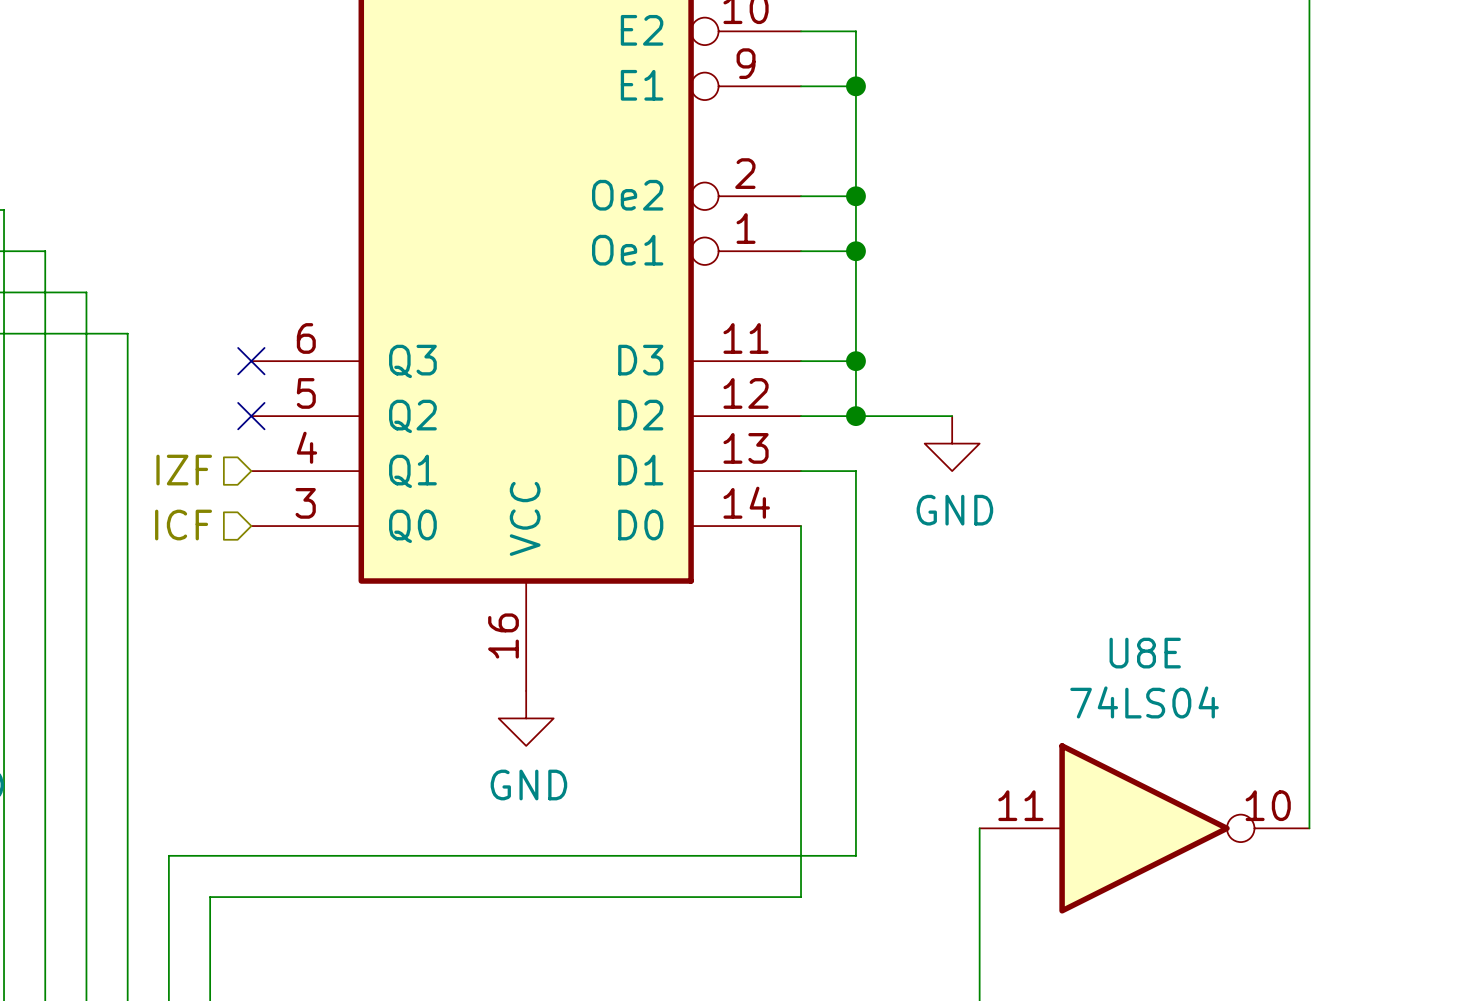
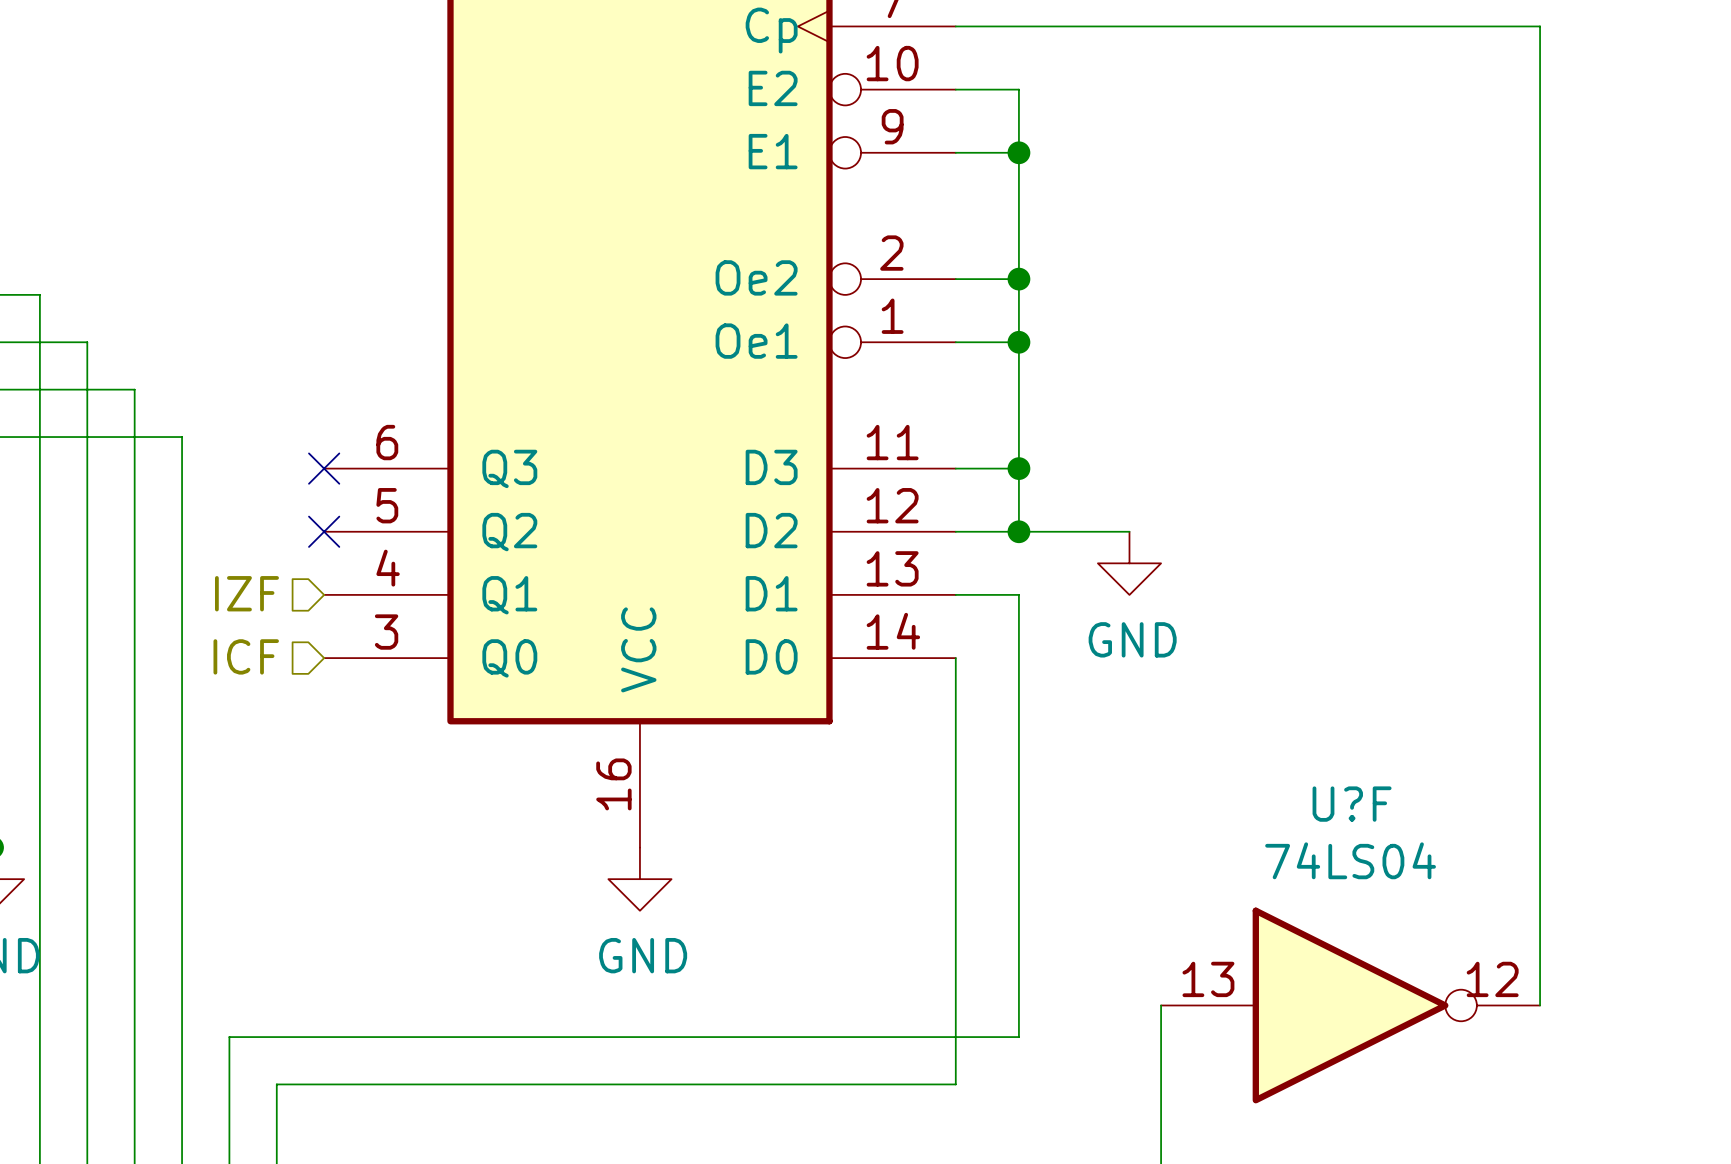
U8E name: U8E (1145, 653) -> U?F (1352, 804)
U8E pin number: 11 (1020, 805) -> 13 (1208, 979)
U8E pin number: 10 (1268, 805) -> 12 (1492, 979)

